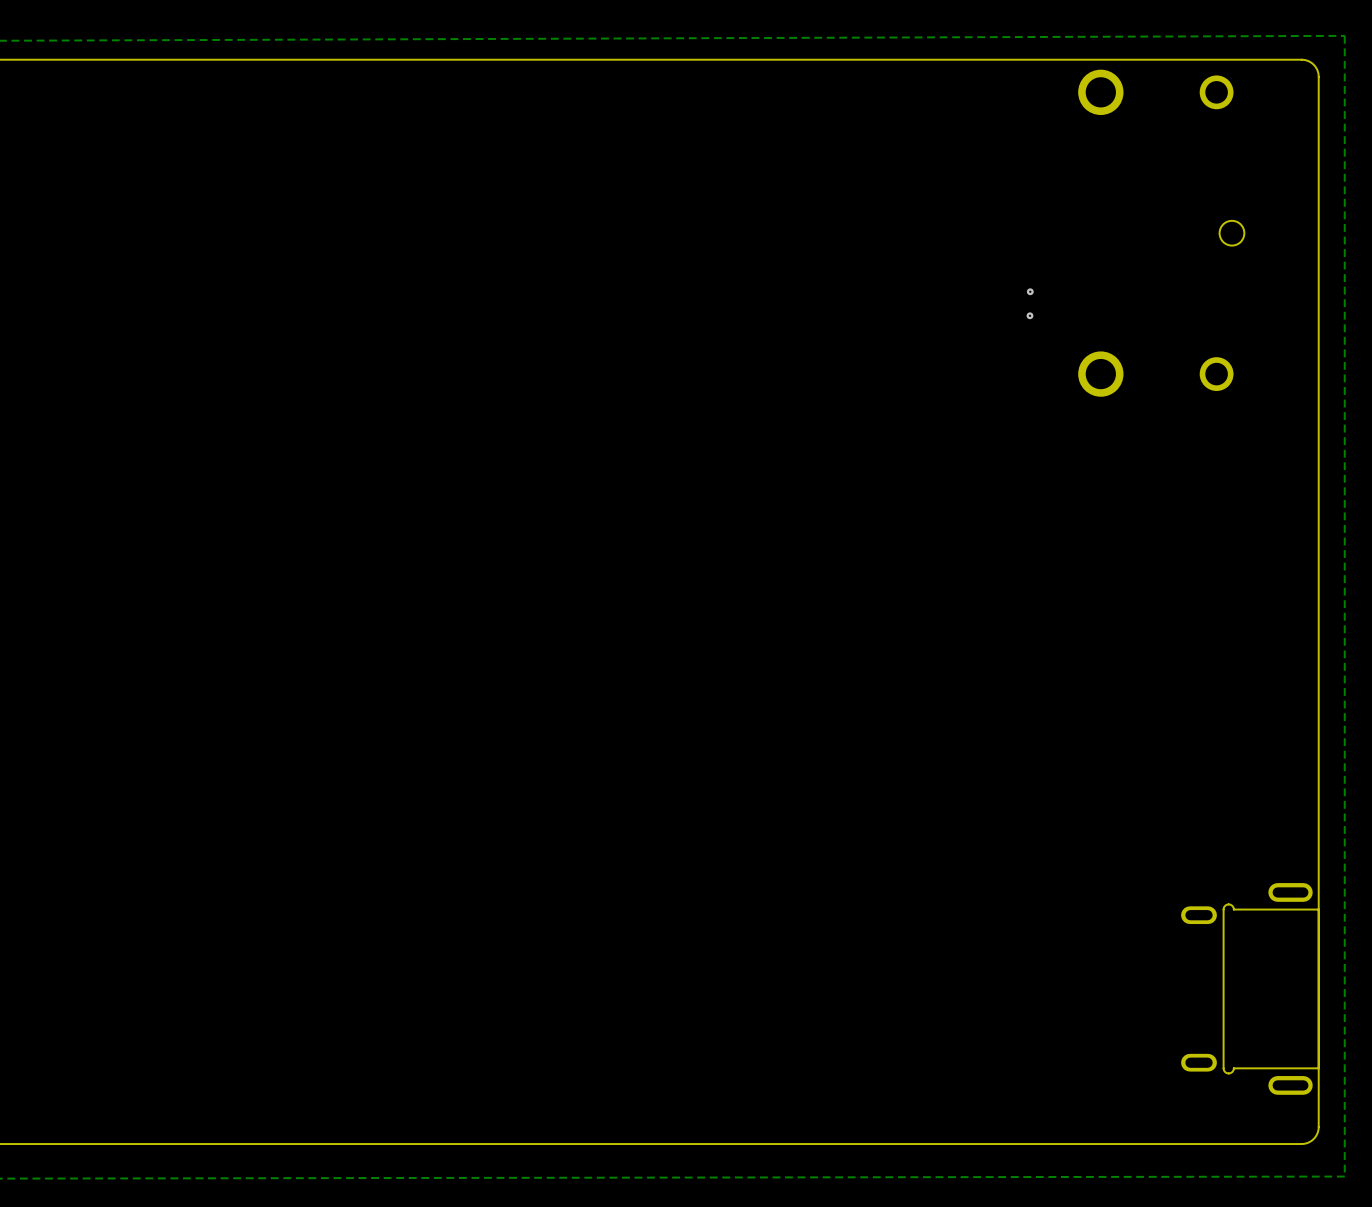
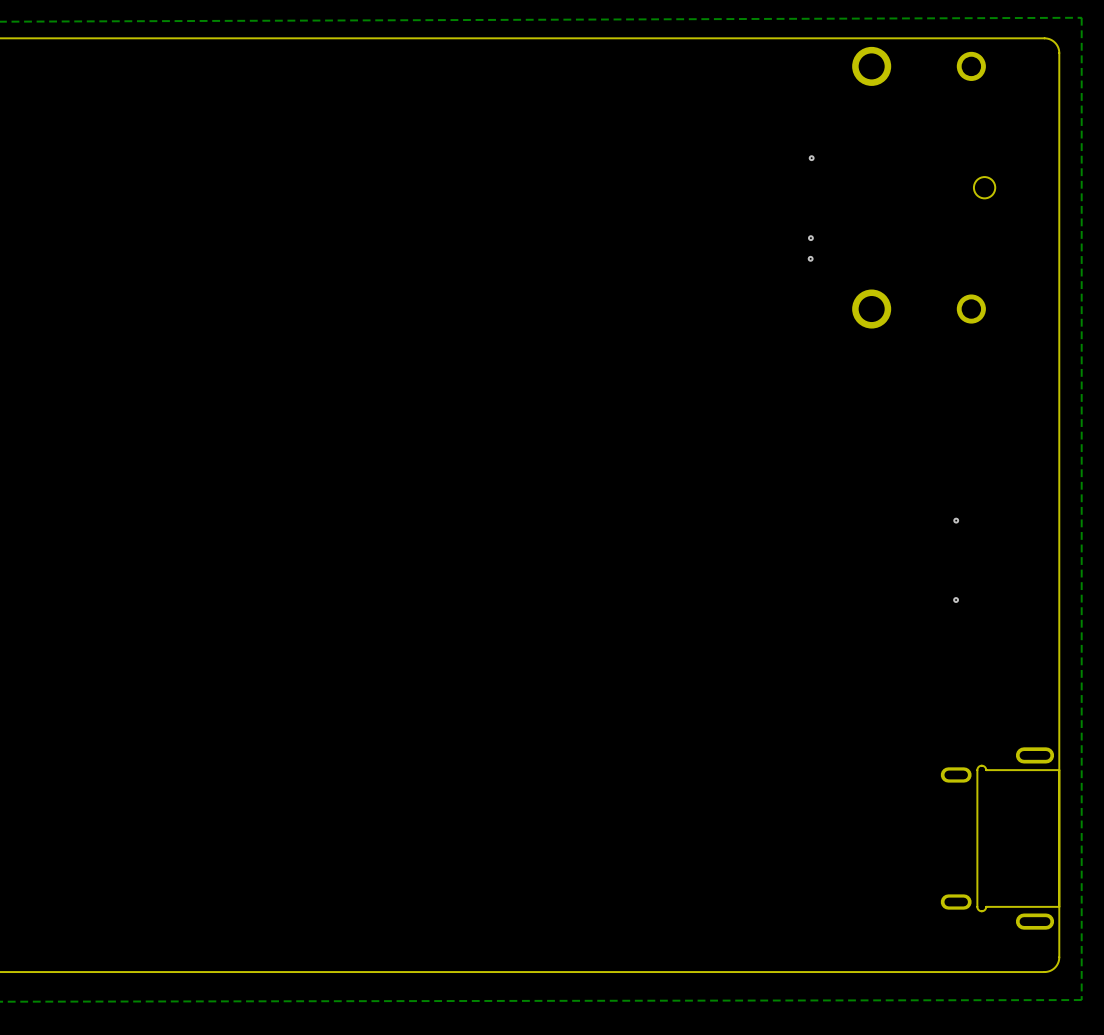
via: none -> (811, 158)
via: none -> (956, 520)
via: none -> (956, 600)

